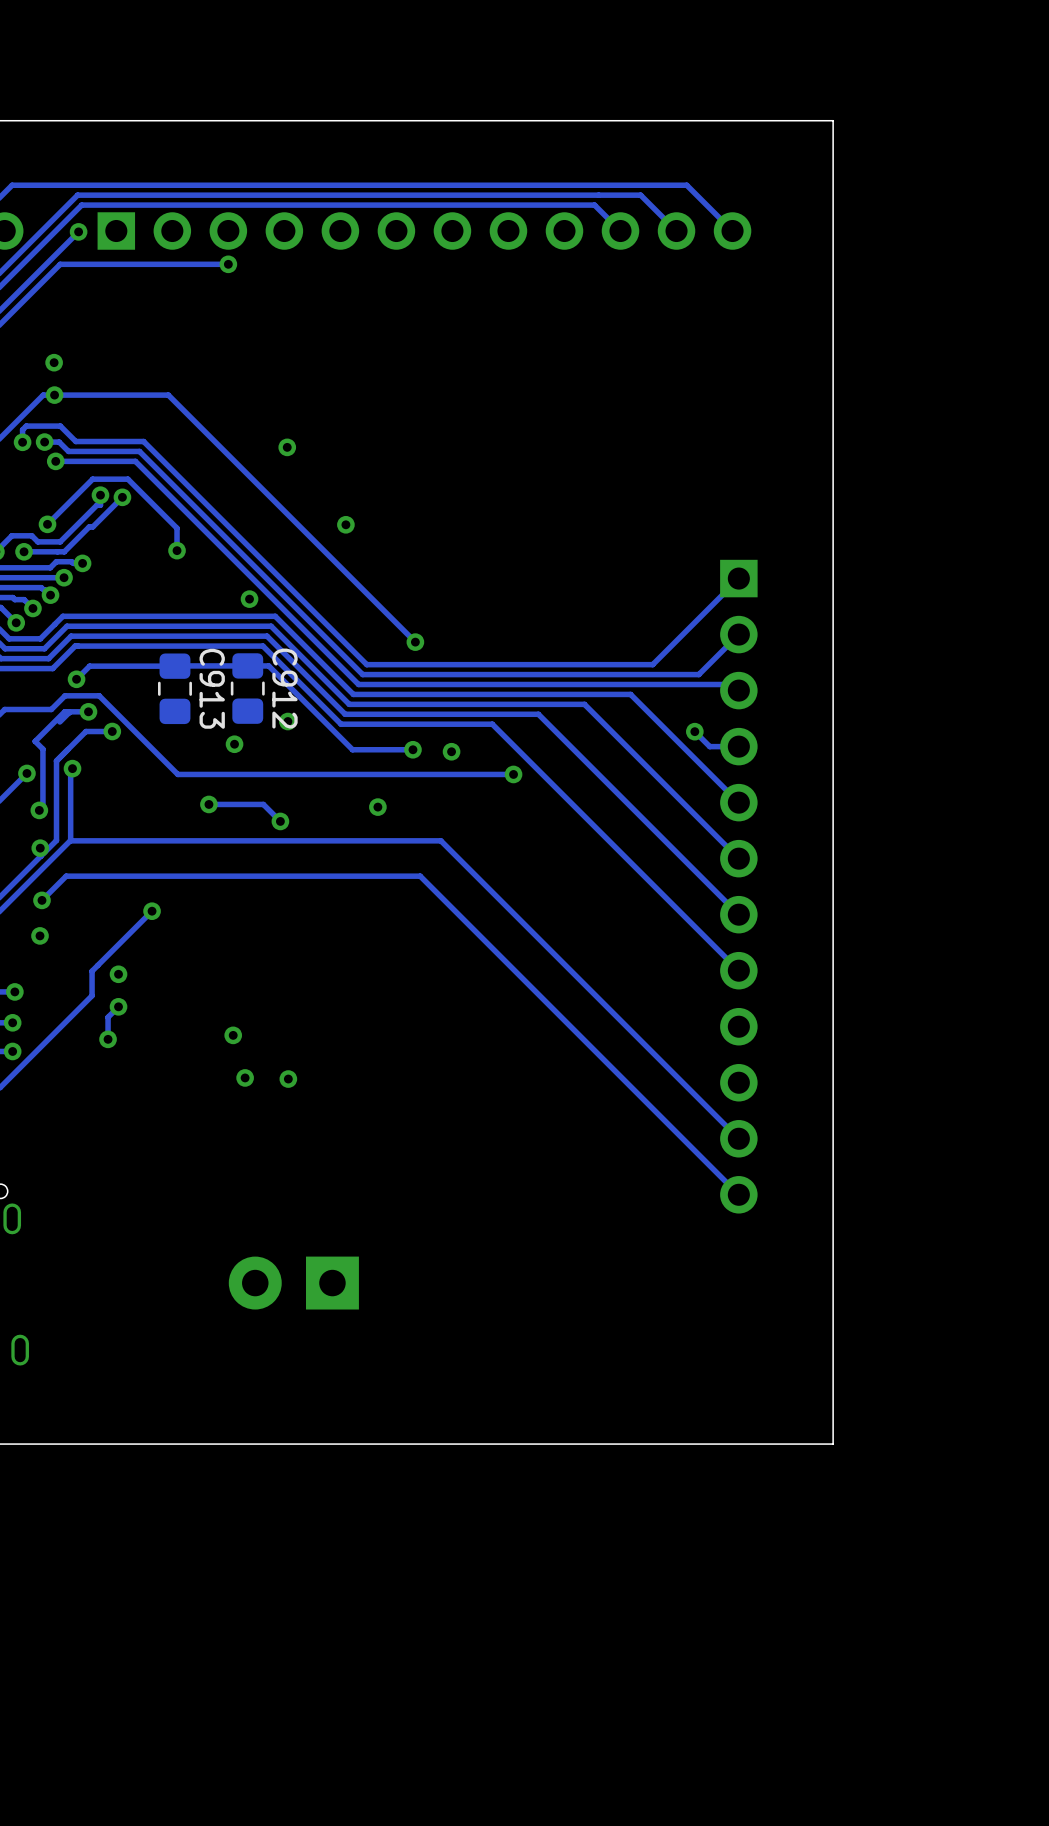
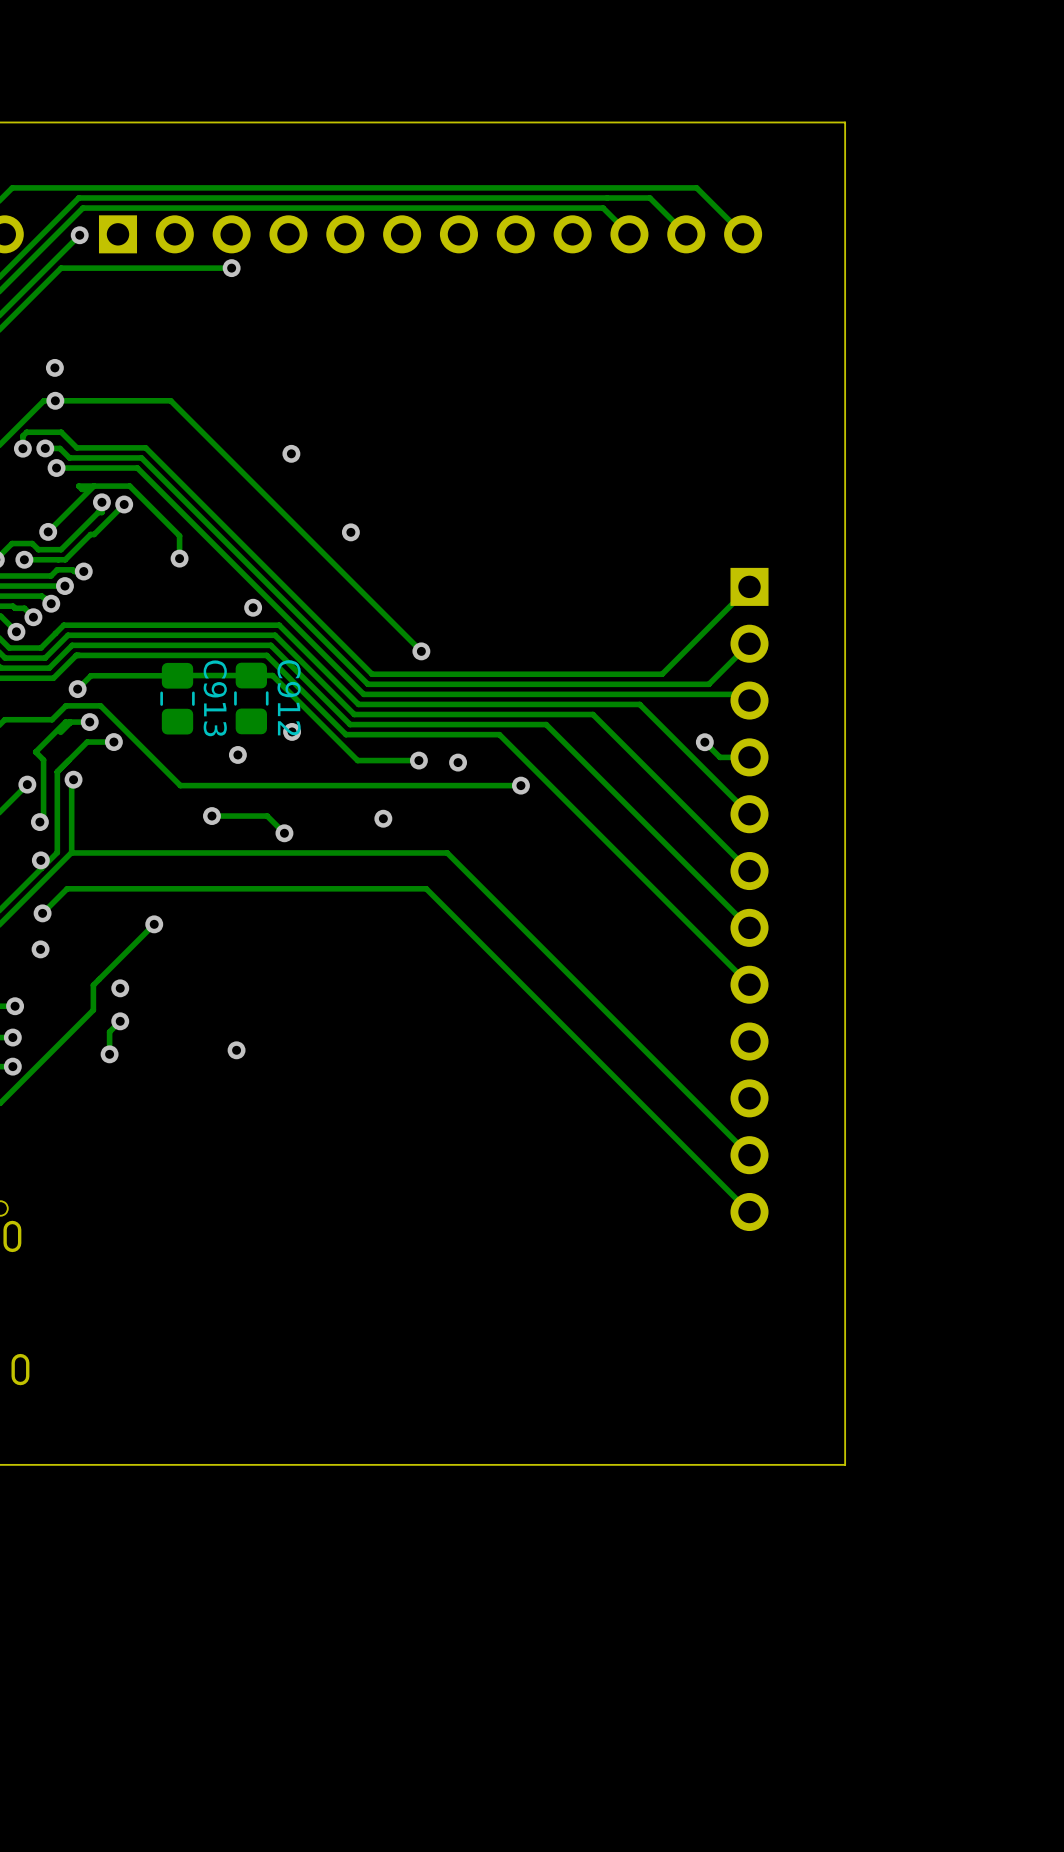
track: none -> (94, 486) (78, 486) (82, 489) (86, 489)
via: (245, 1077) -> none
via: (288, 1079) -> none
part: (293, 1283) -> none

